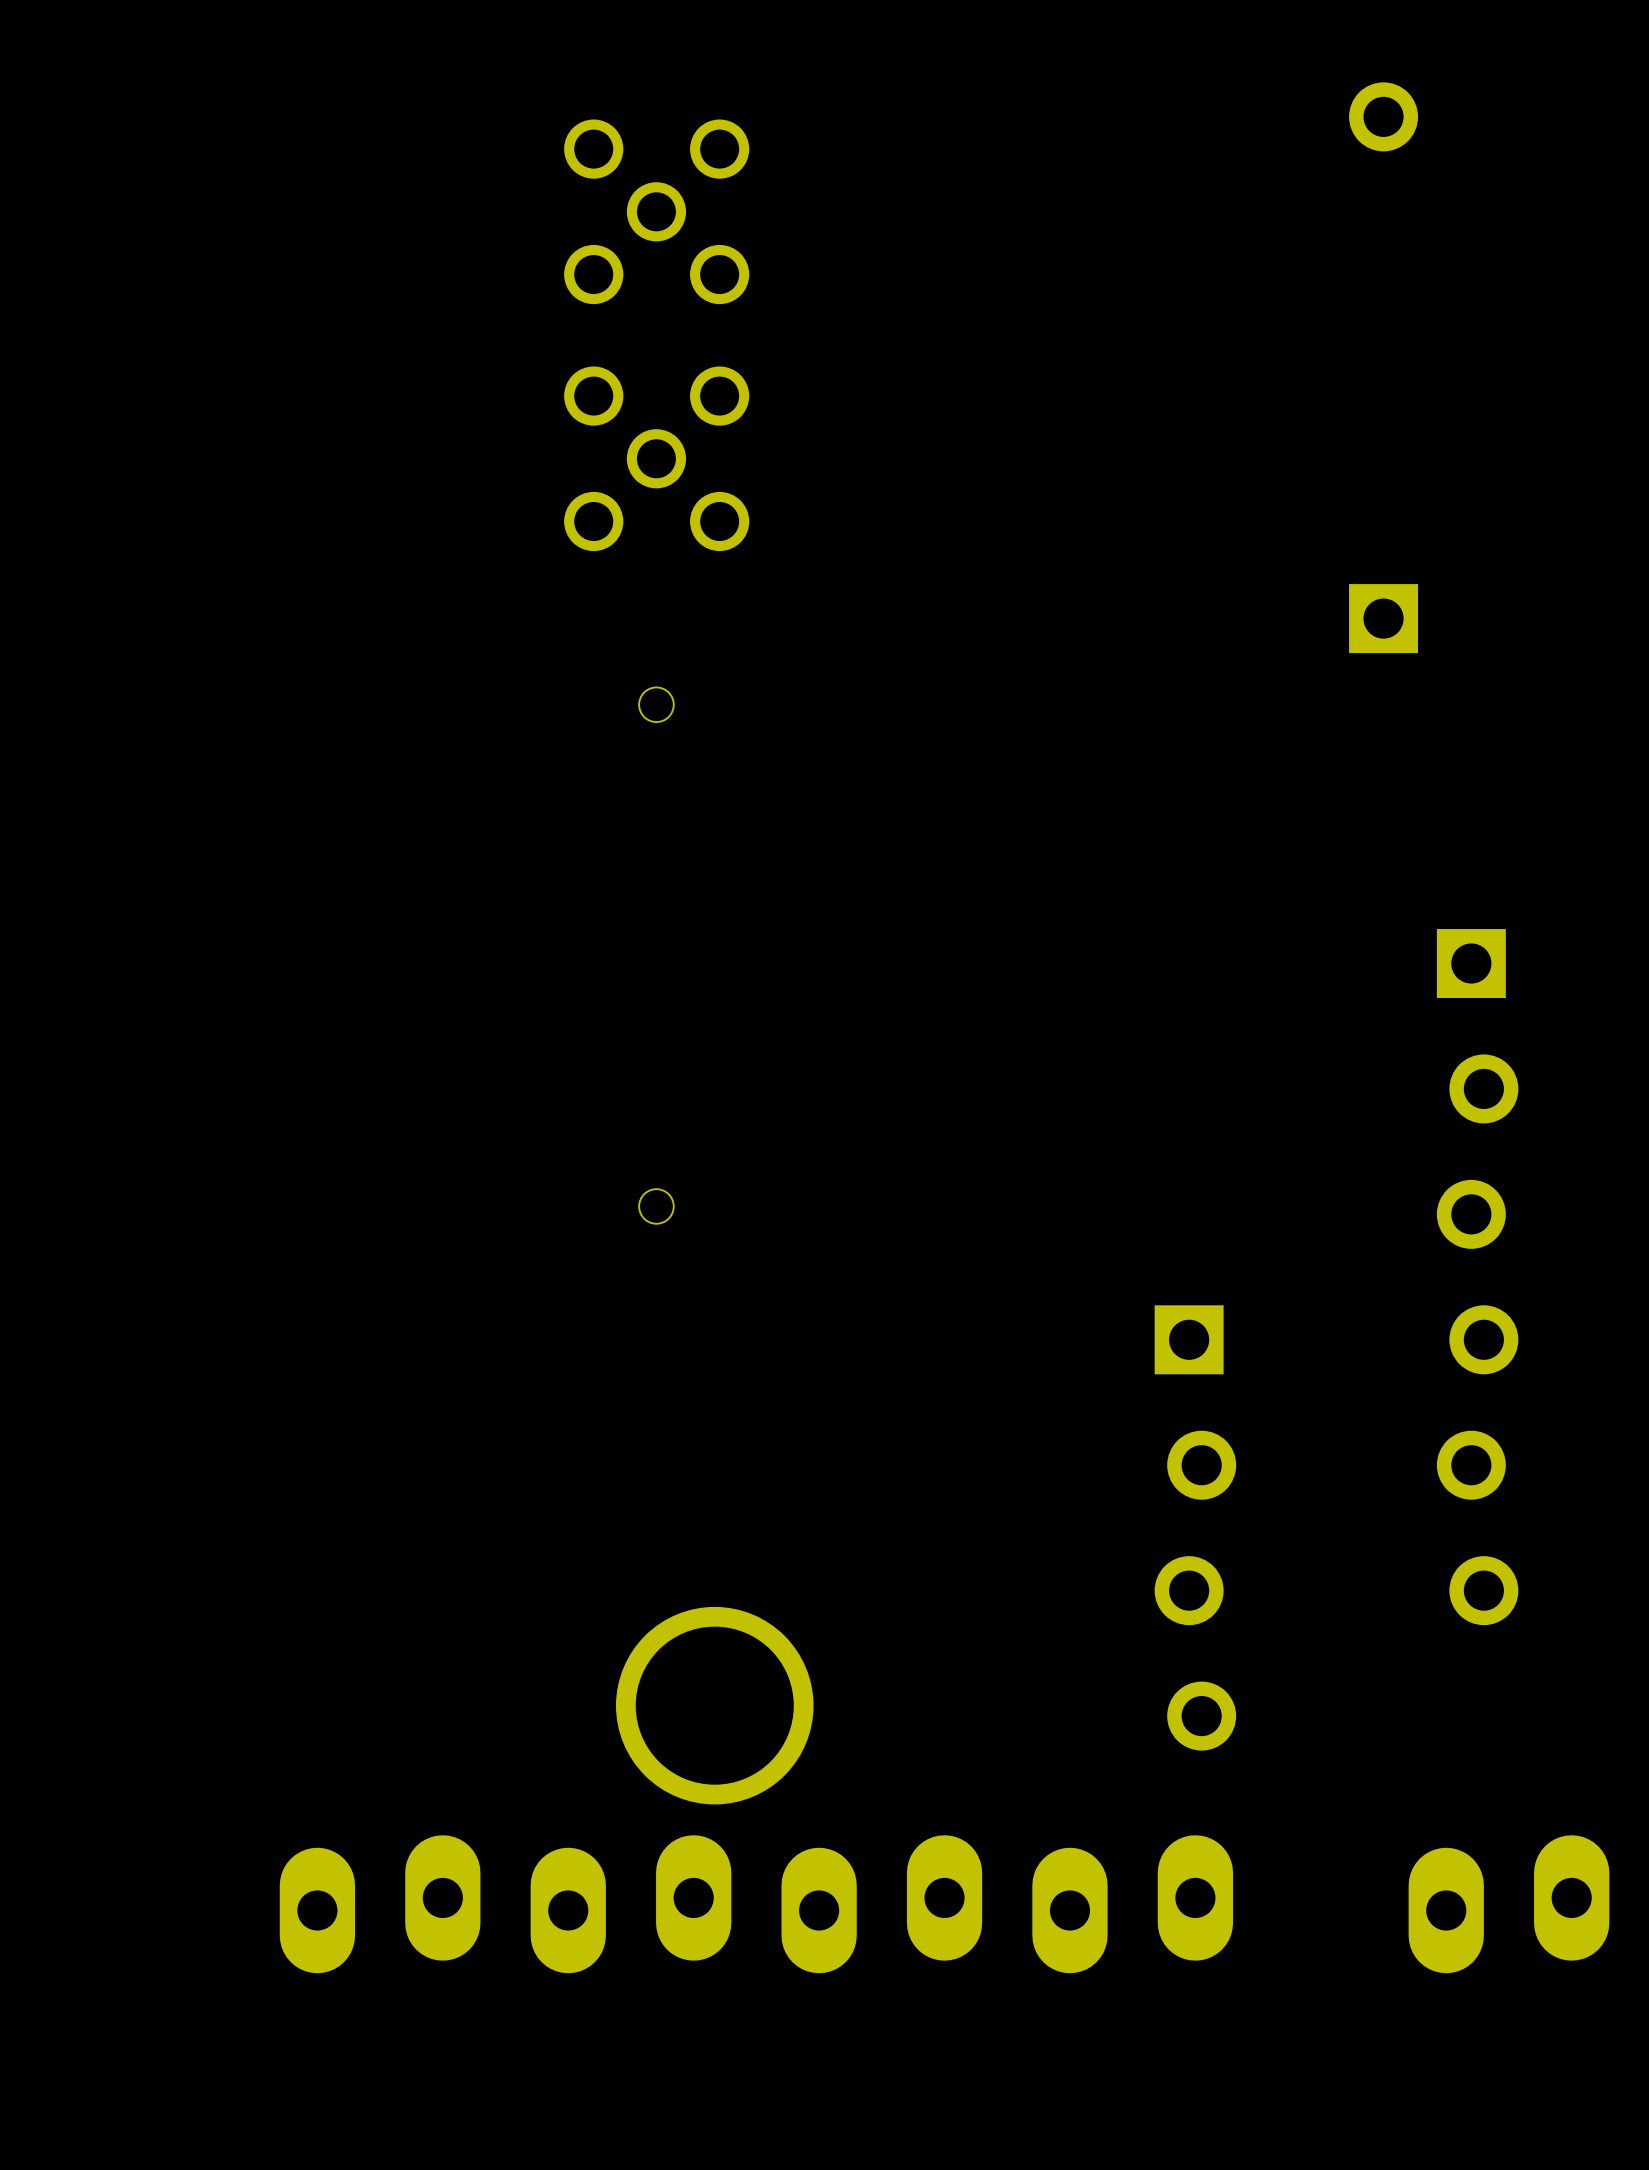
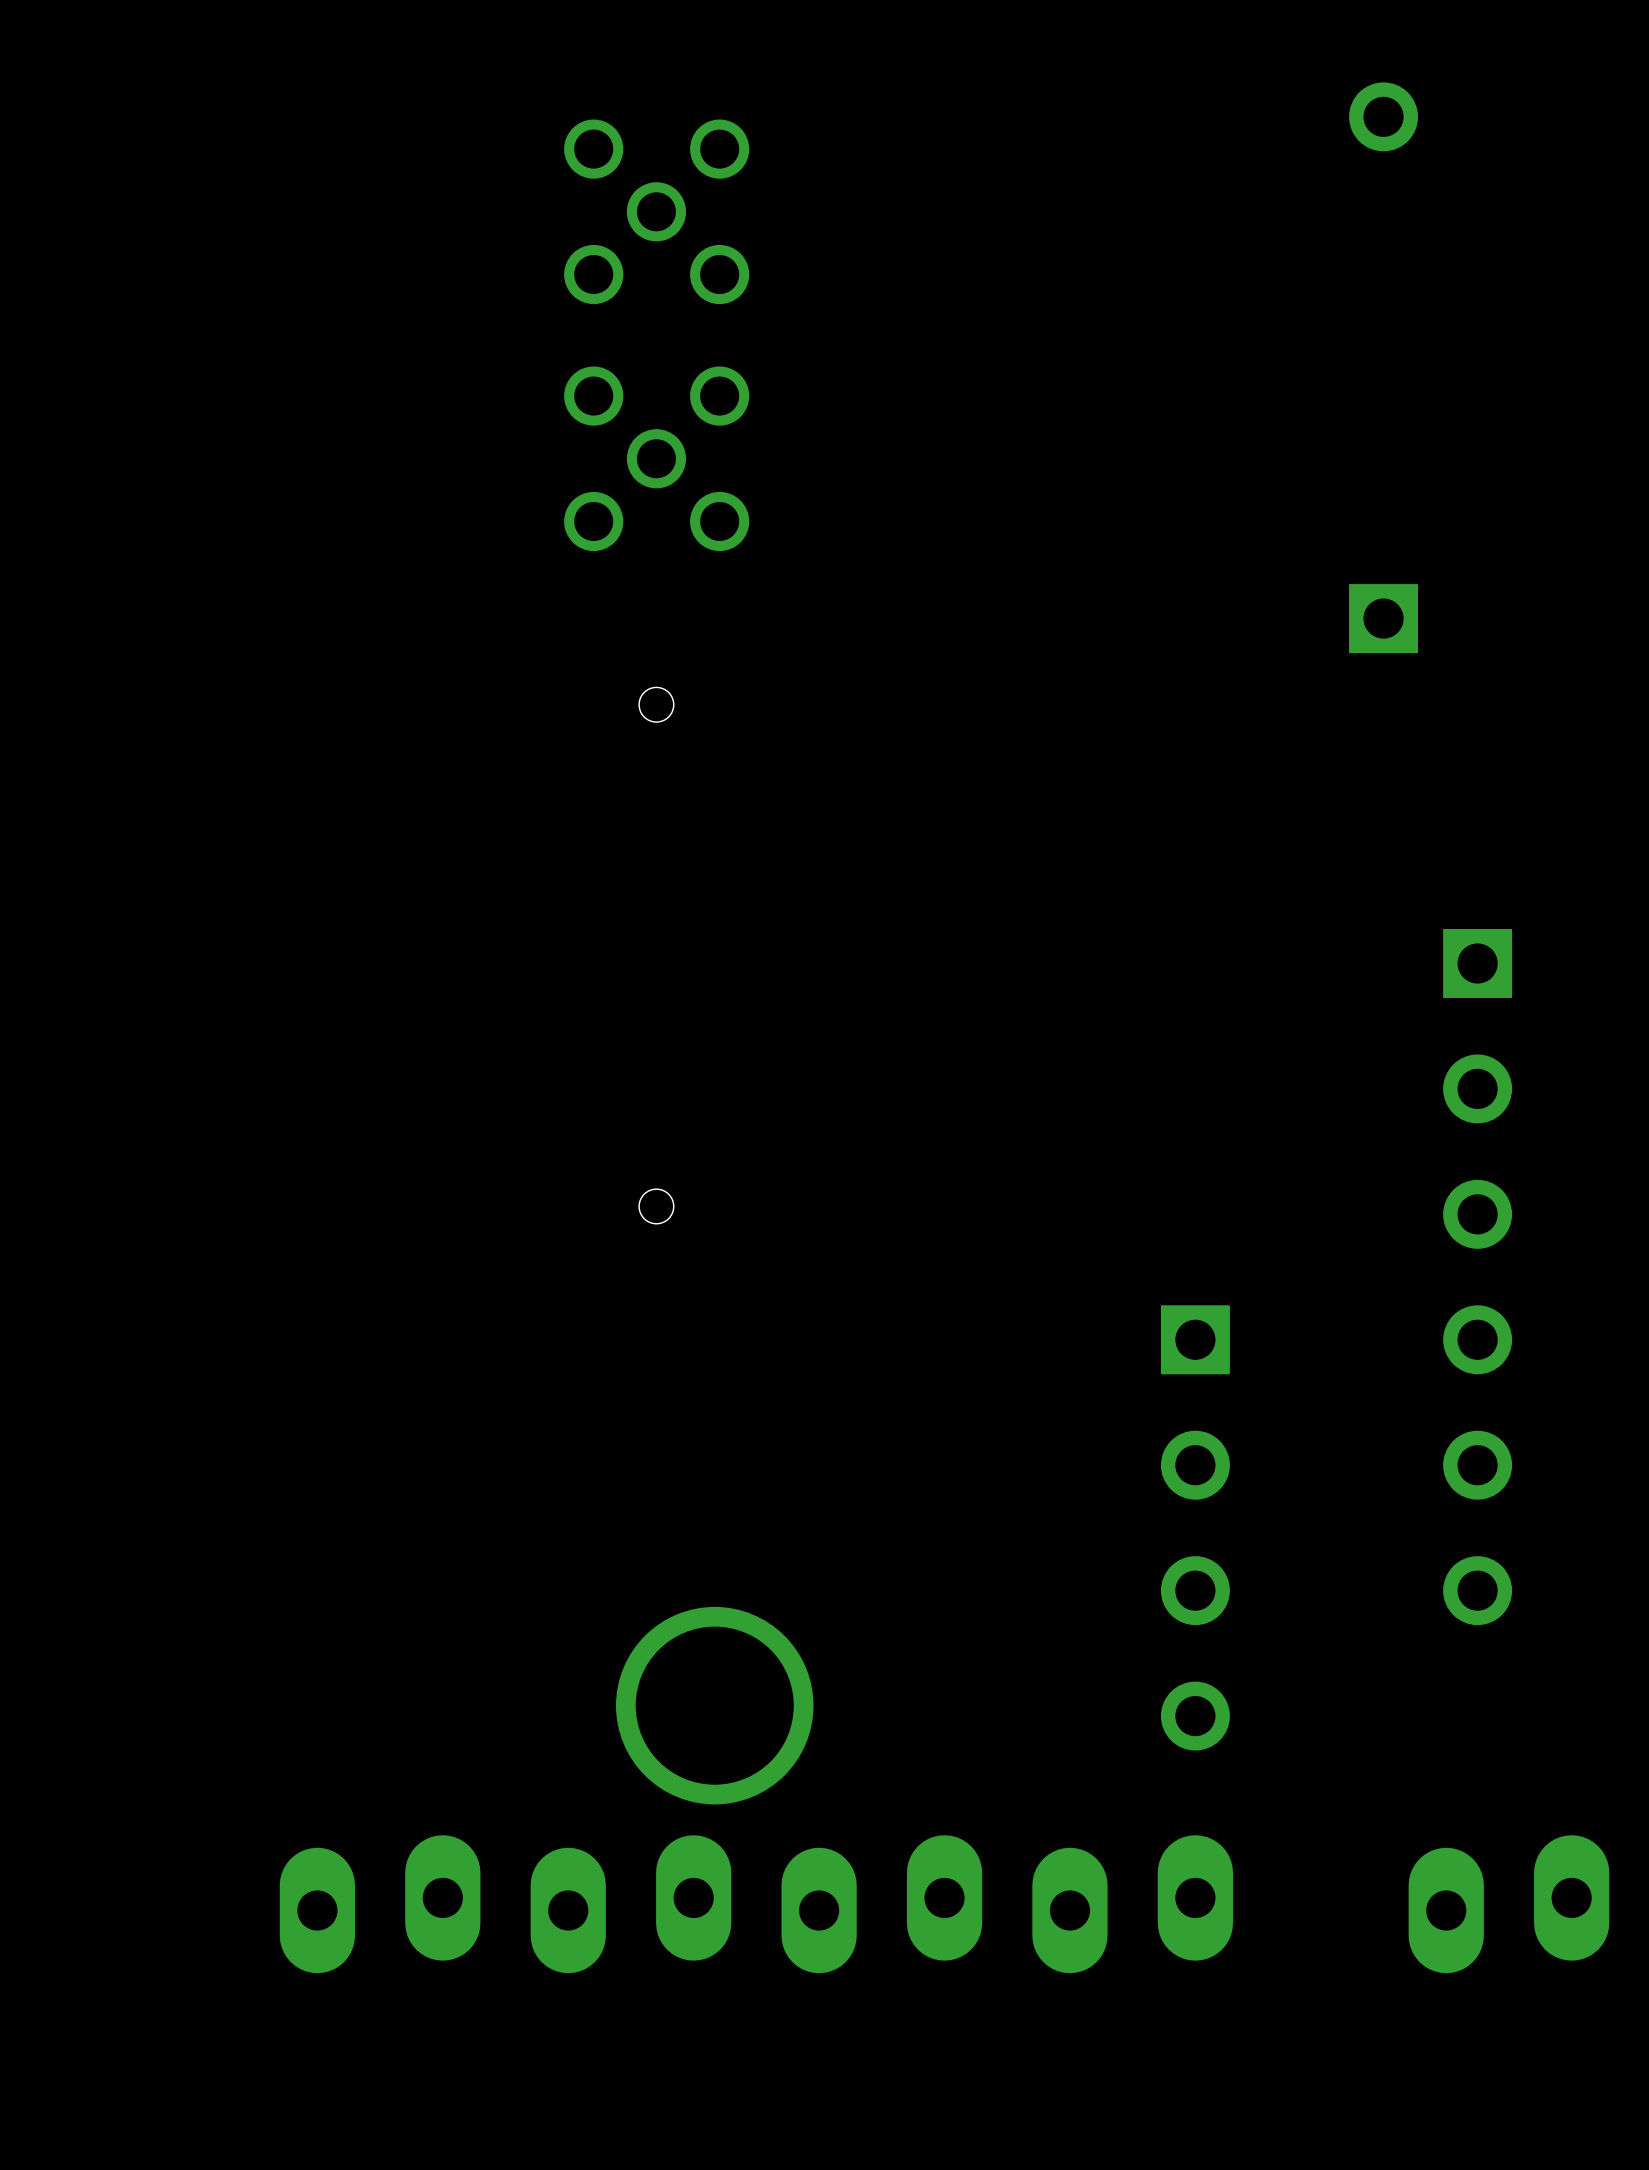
part footprint: [1436, 929, 1519, 1626] -> [1443, 929, 1513, 1626]
part footprint: [1154, 1305, 1237, 1751] -> [1160, 1305, 1230, 1751]

